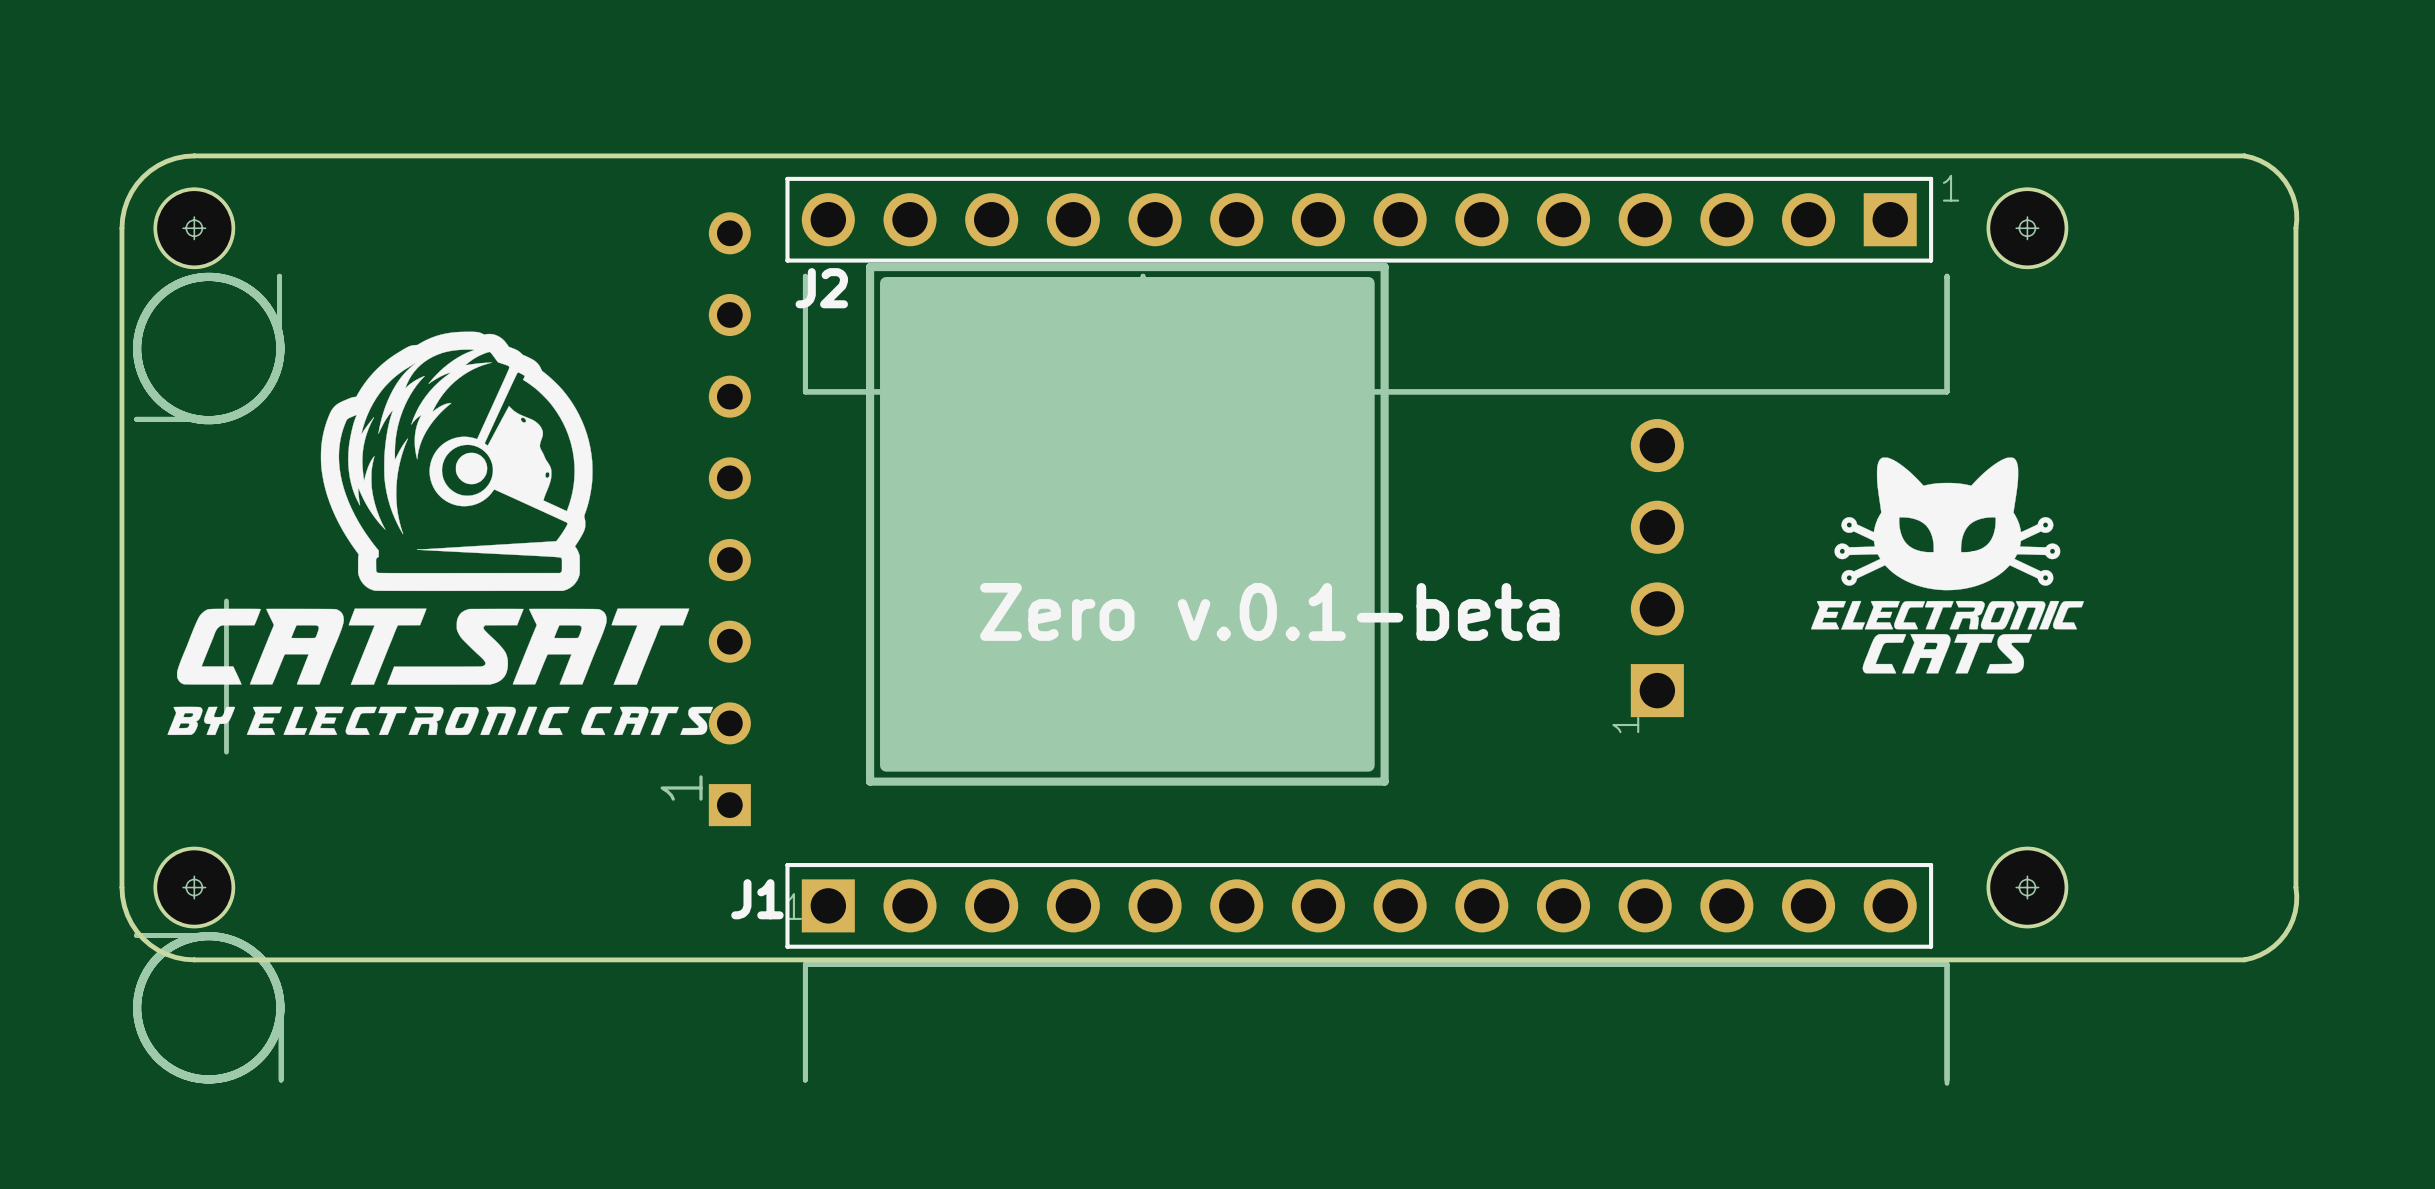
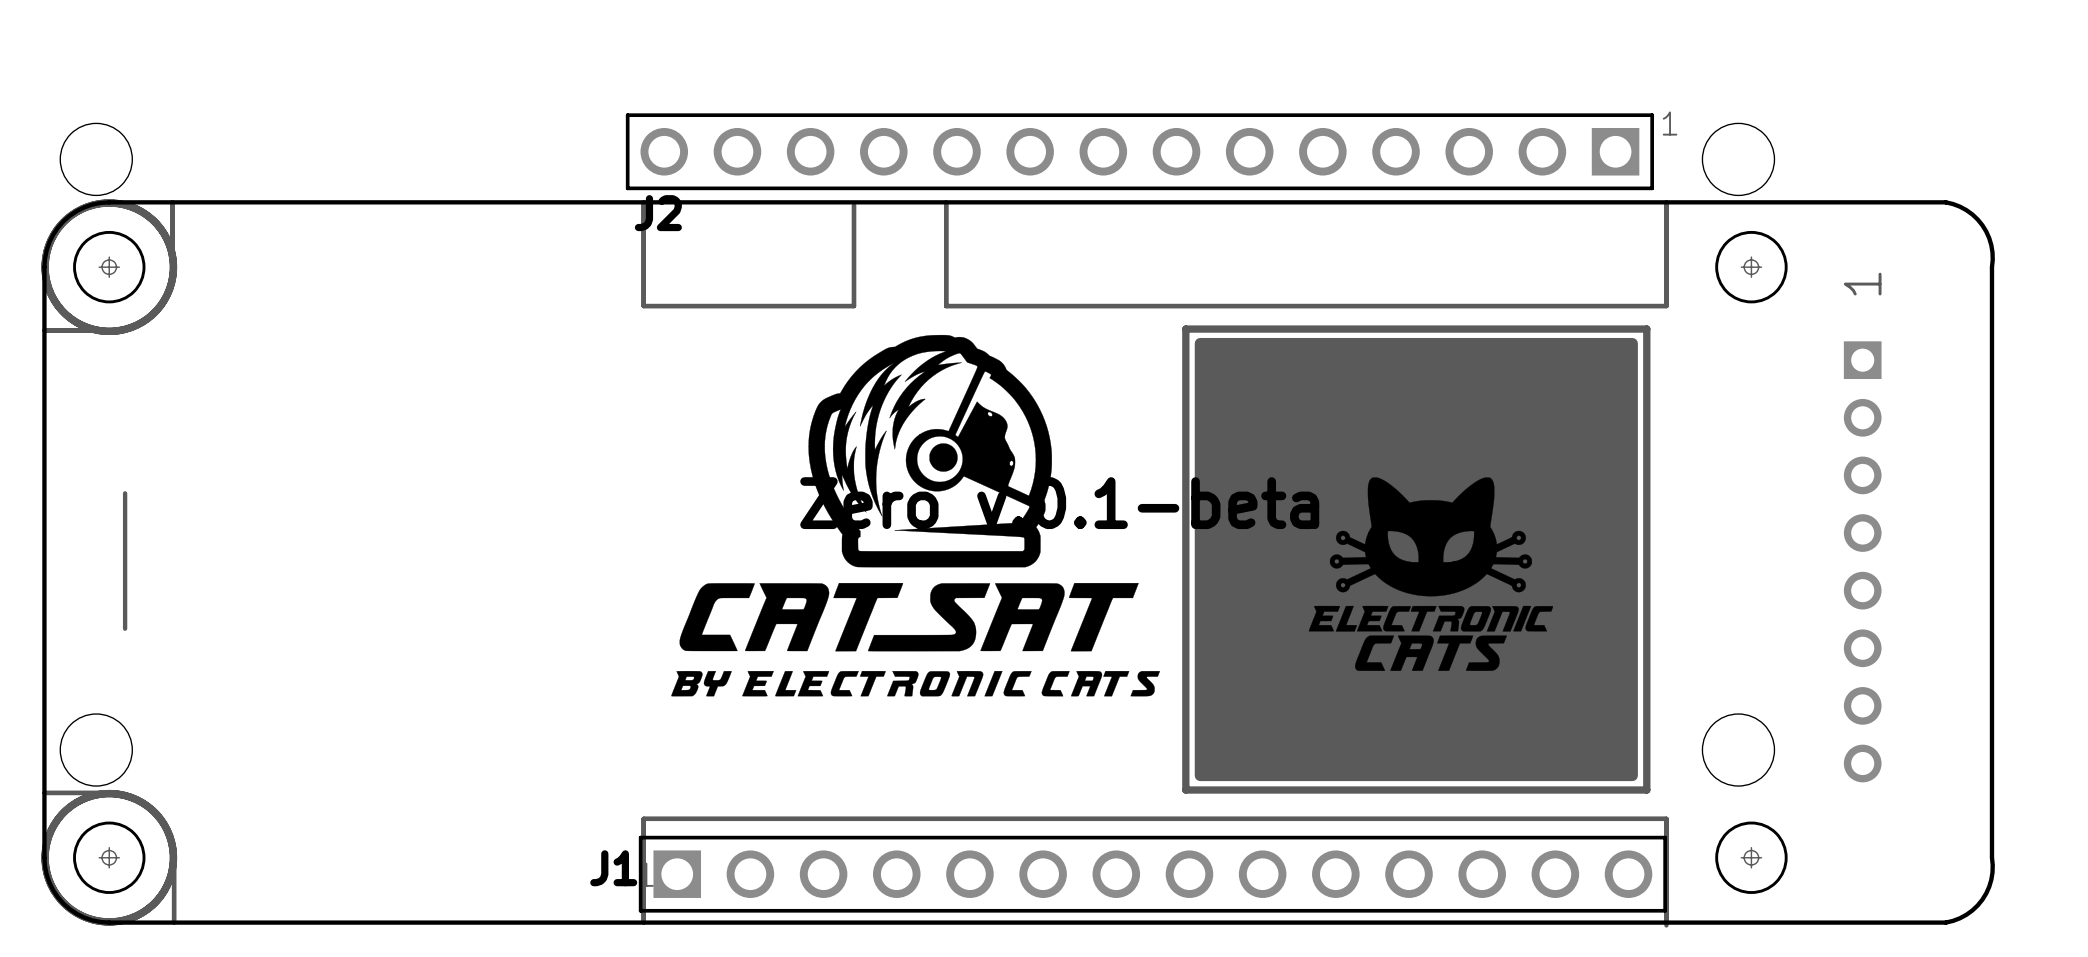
board edge: (194, 155) (2244, 155) (2252, 157) (2267, 164) (2285, 181) (2292, 195) (2296, 211) (2296, 895) (2292, 919) (2285, 934) (2274, 946) (2260, 955) (2244, 959) (194, 959) (166, 954) (150, 944) (136, 931) (124, 906) (121, 887) (121, 228) (127, 200) (143, 177) (166, 161) (194, 155) -> (109, 202) (1945, 202) (1953, 204) (1966, 210) (1977, 219) (1989, 238) (1992, 252) (1992, 865) (1989, 886) (1982, 899) (1972, 910) (1959, 918) (1945, 922) (109, 922) (84, 917) (69, 909) (57, 897) (46, 874) (44, 857) (44, 267) (49, 242) (63, 221) (84, 207) (109, 202)
drawing position: (194, 228) -> (109, 267)
drawing position: (2027, 228) -> (1751, 267)
part: (729, 519) -> none
part position: (1127, 524) -> (1416, 559)
drawing position: (440, 533) -> (915, 515)
drawing position: (1947, 565) -> (1430, 574)
part: (1657, 568) -> none
part: none -> (1862, 561)
drawing position: (194, 887) -> (109, 857)
drawing position: (2027, 887) -> (1751, 857)
J1 position: (1359, 905) -> (1152, 874)

